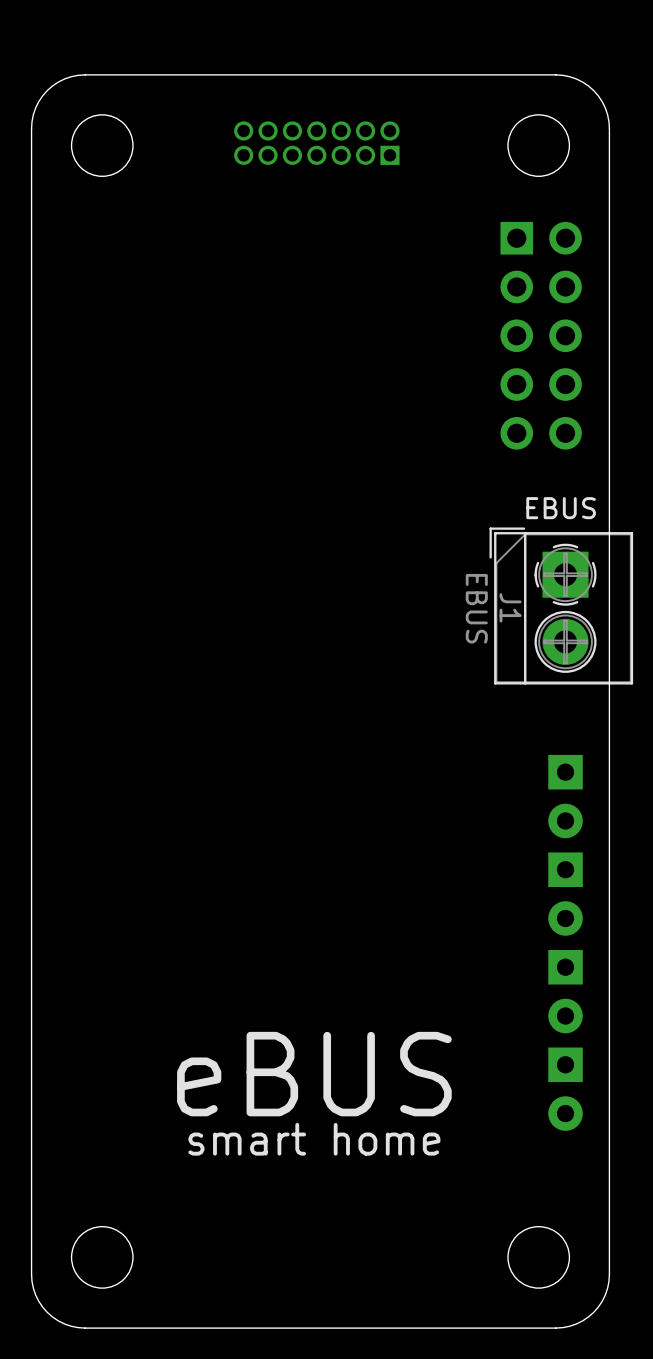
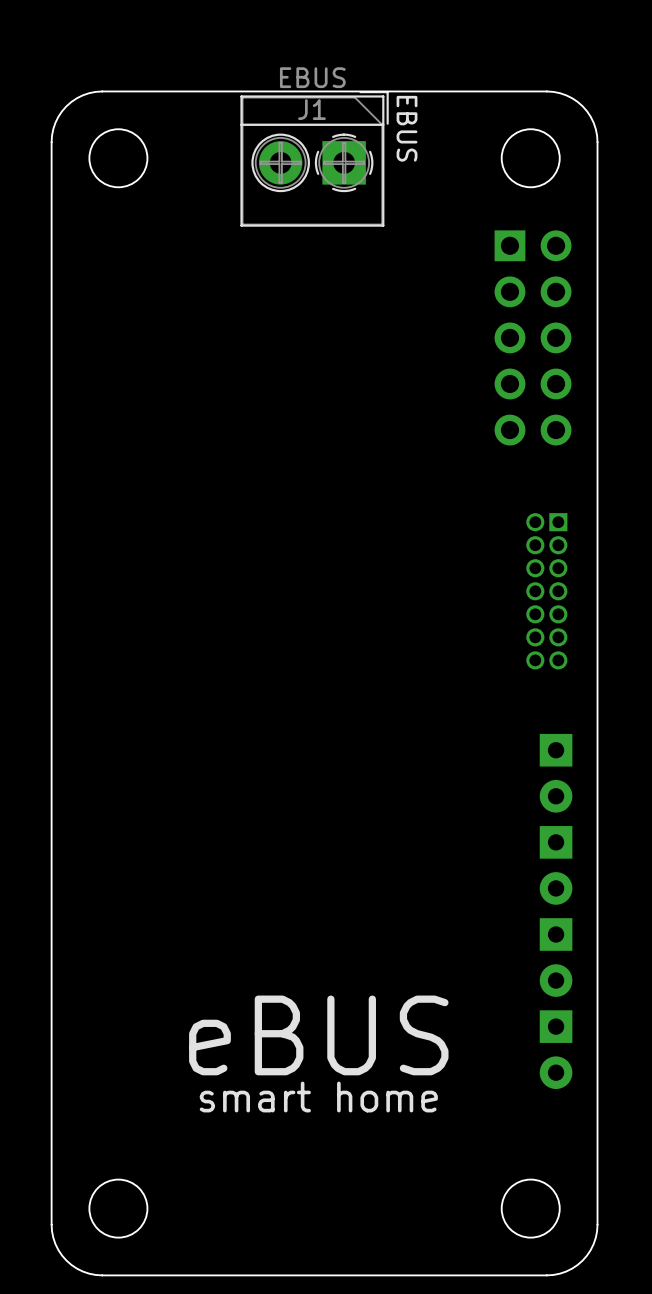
part: (316, 143) -> none
text rotation: 0° (561, 508) -> 90° clockwise (407, 128)
text position: EBUS (561, 508) -> EBUS (407, 128)
part: none -> (546, 591)
J1 rotation: 0° (561, 605) -> 90° clockwise (314, 158)
J1 position: (561, 605) -> (314, 158)

